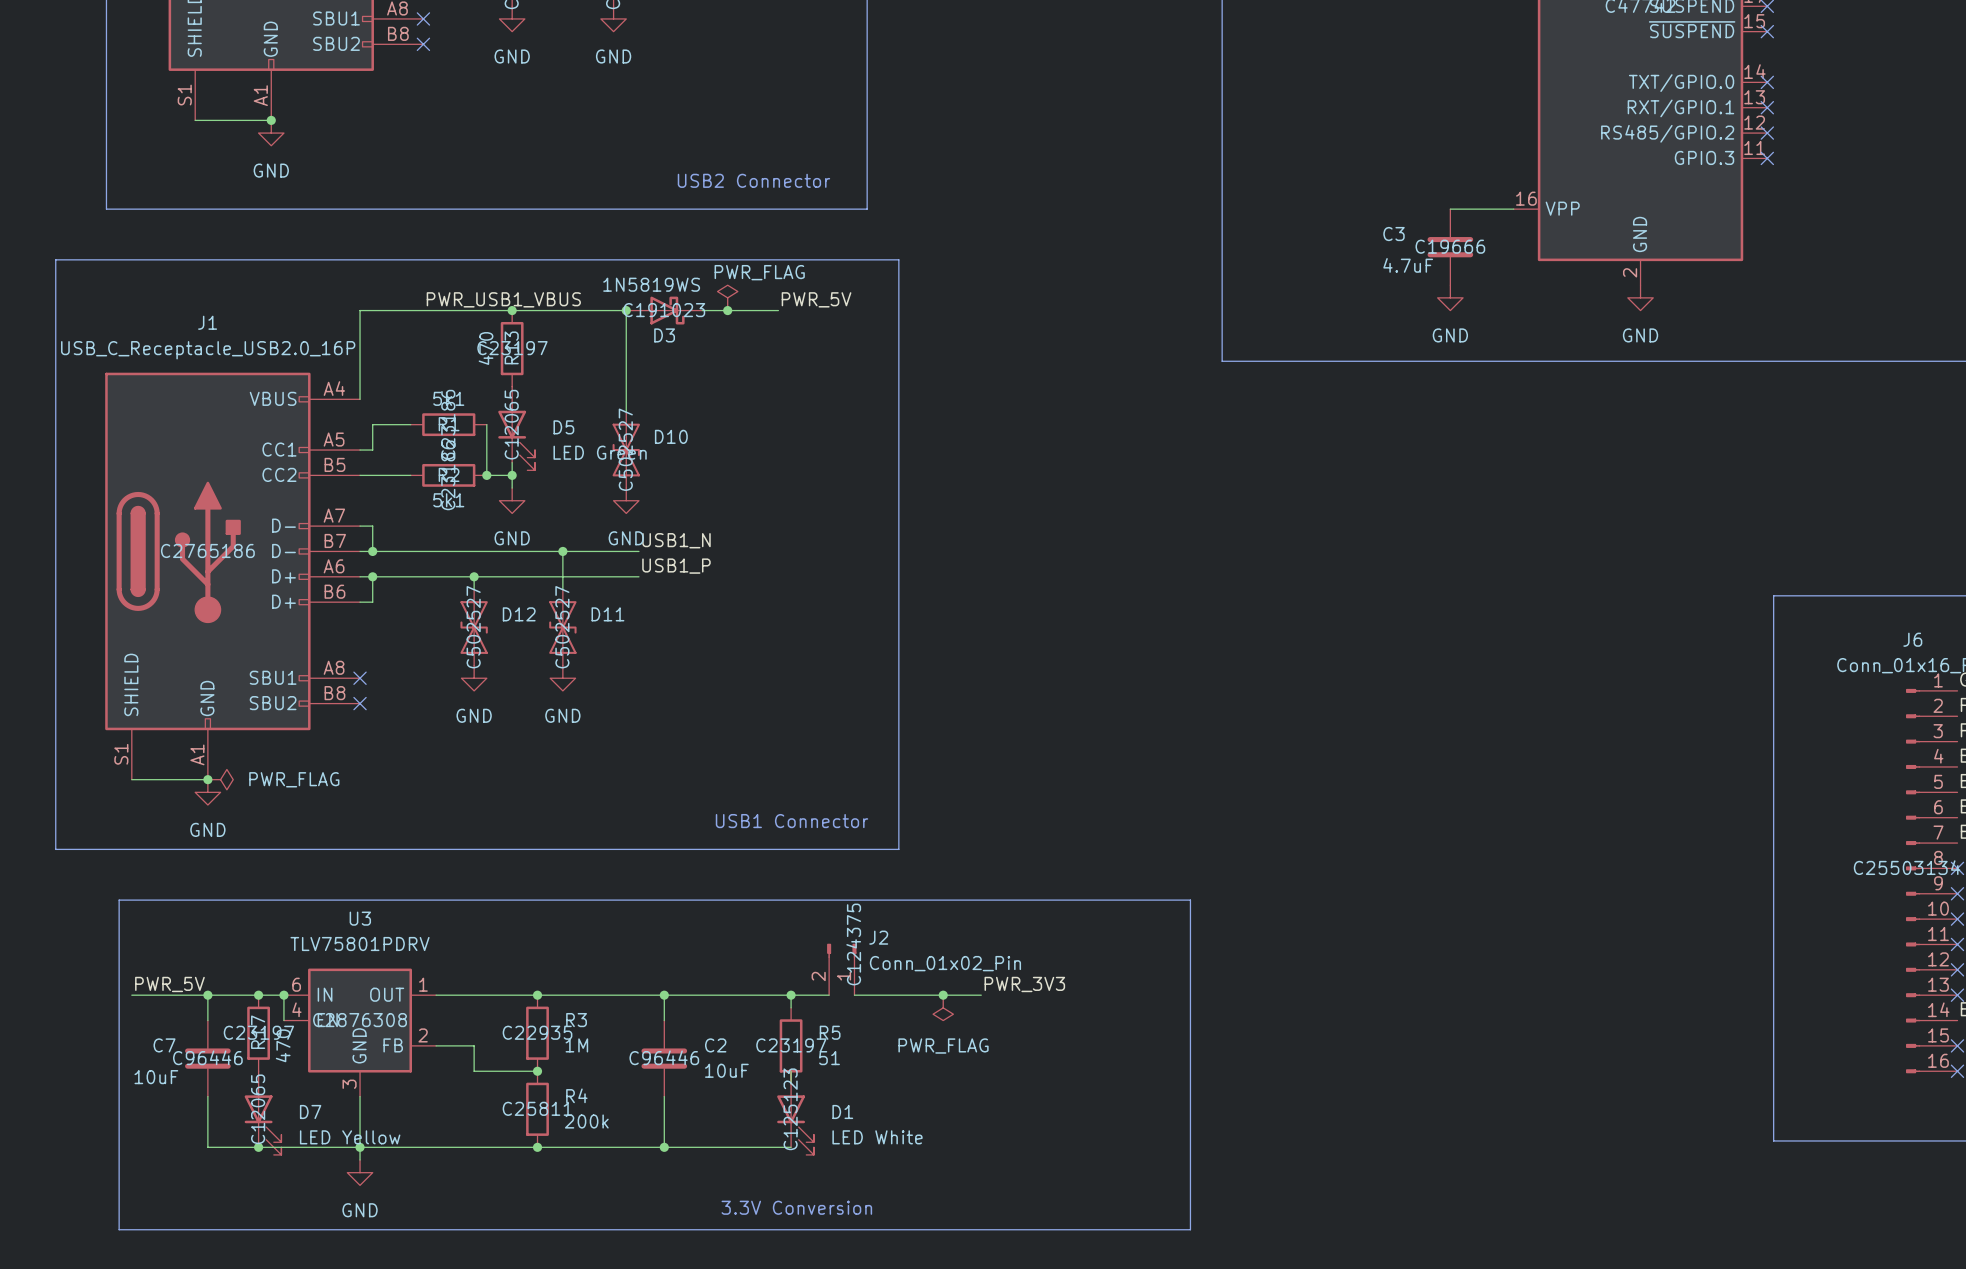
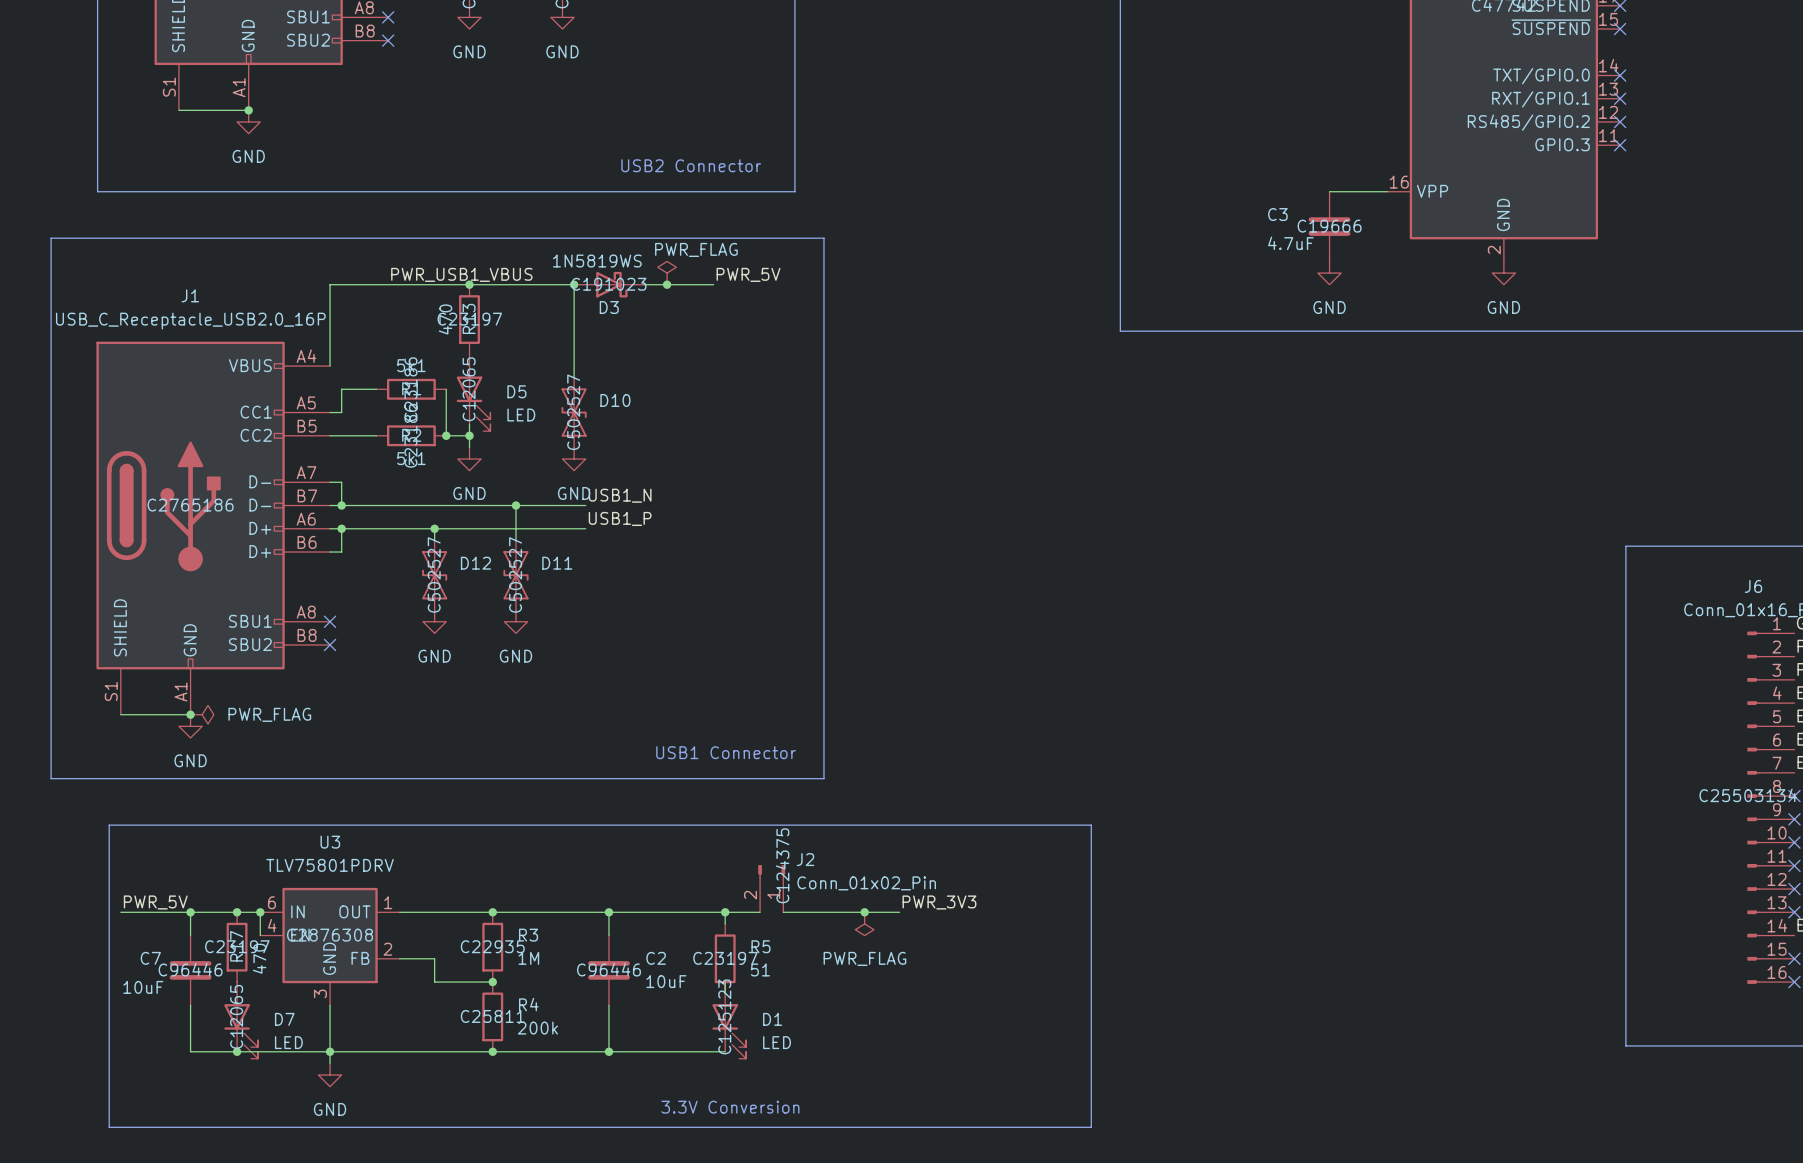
D5 value: LED Green (600, 452) -> LED (521, 415)
D7 value: LED Yellow (350, 1137) -> LED (288, 1042)
D1 value: LED White (877, 1137) -> LED (777, 1042)

